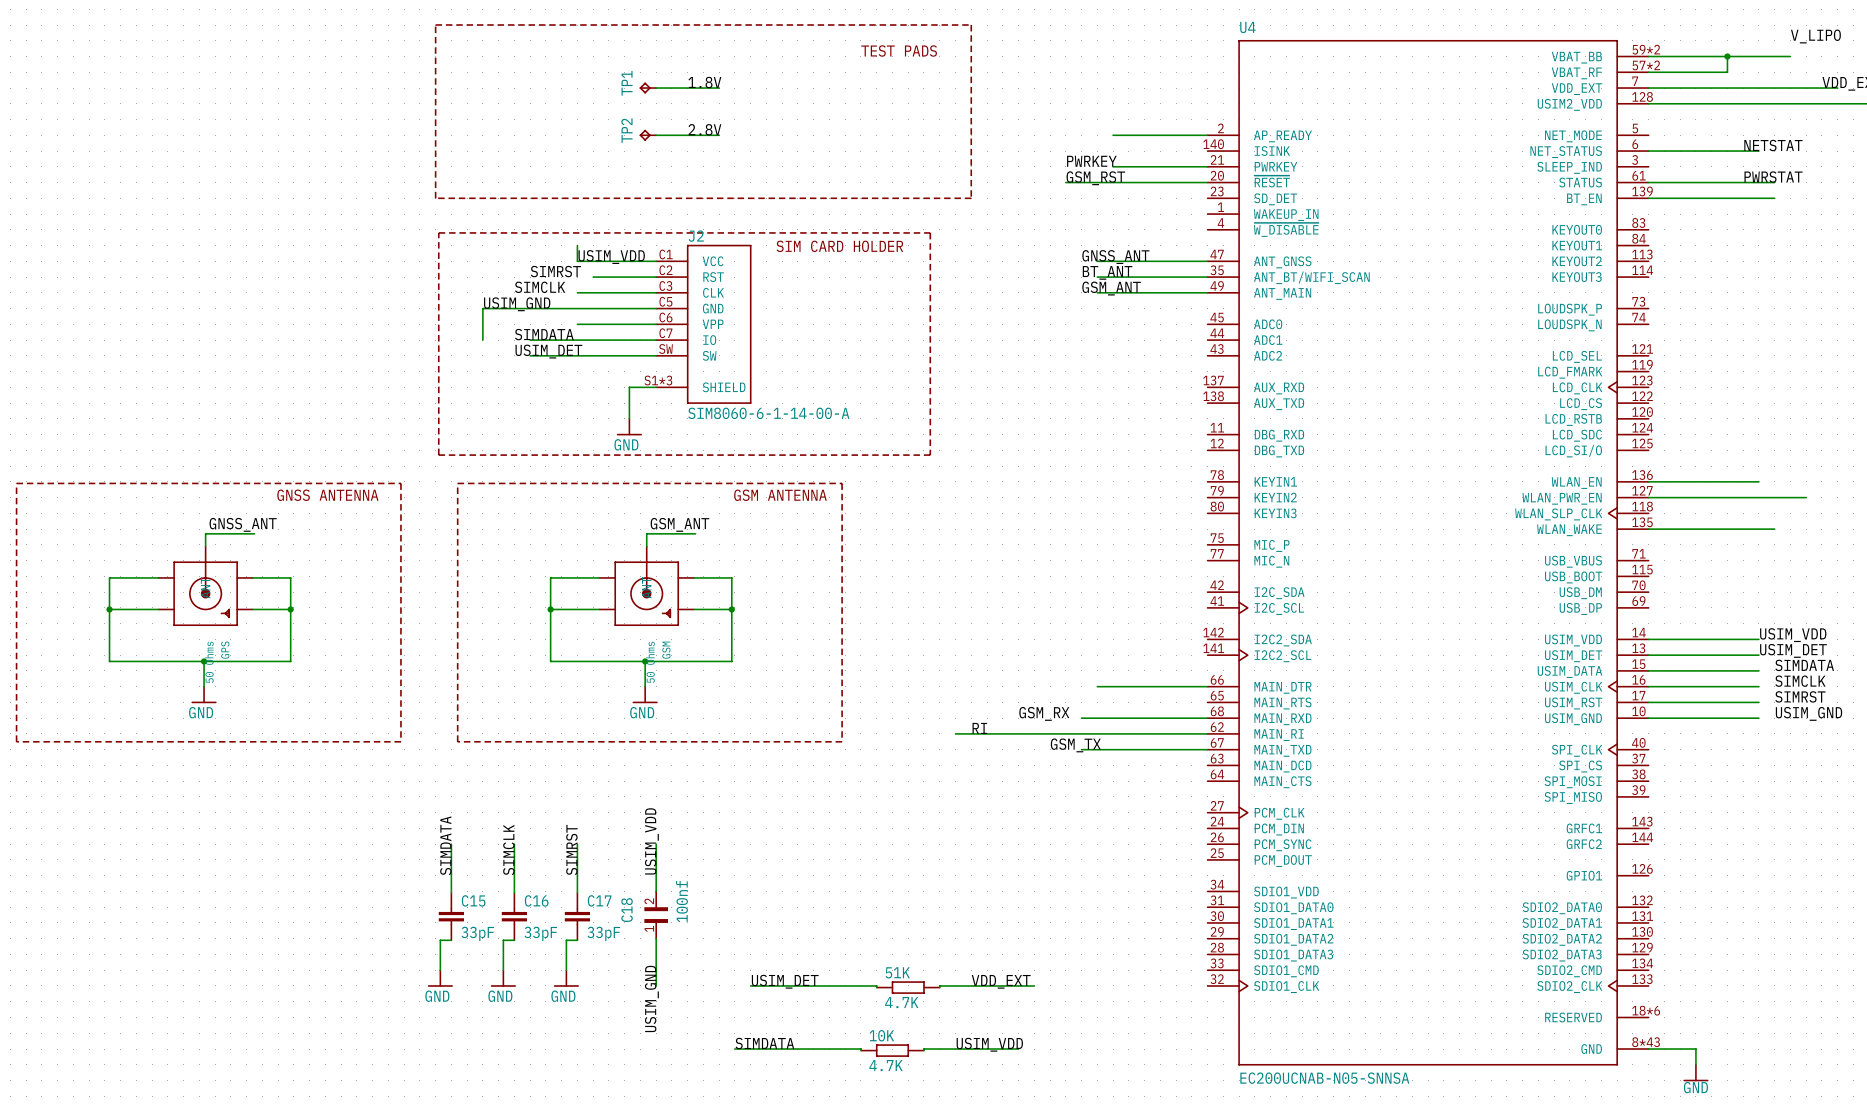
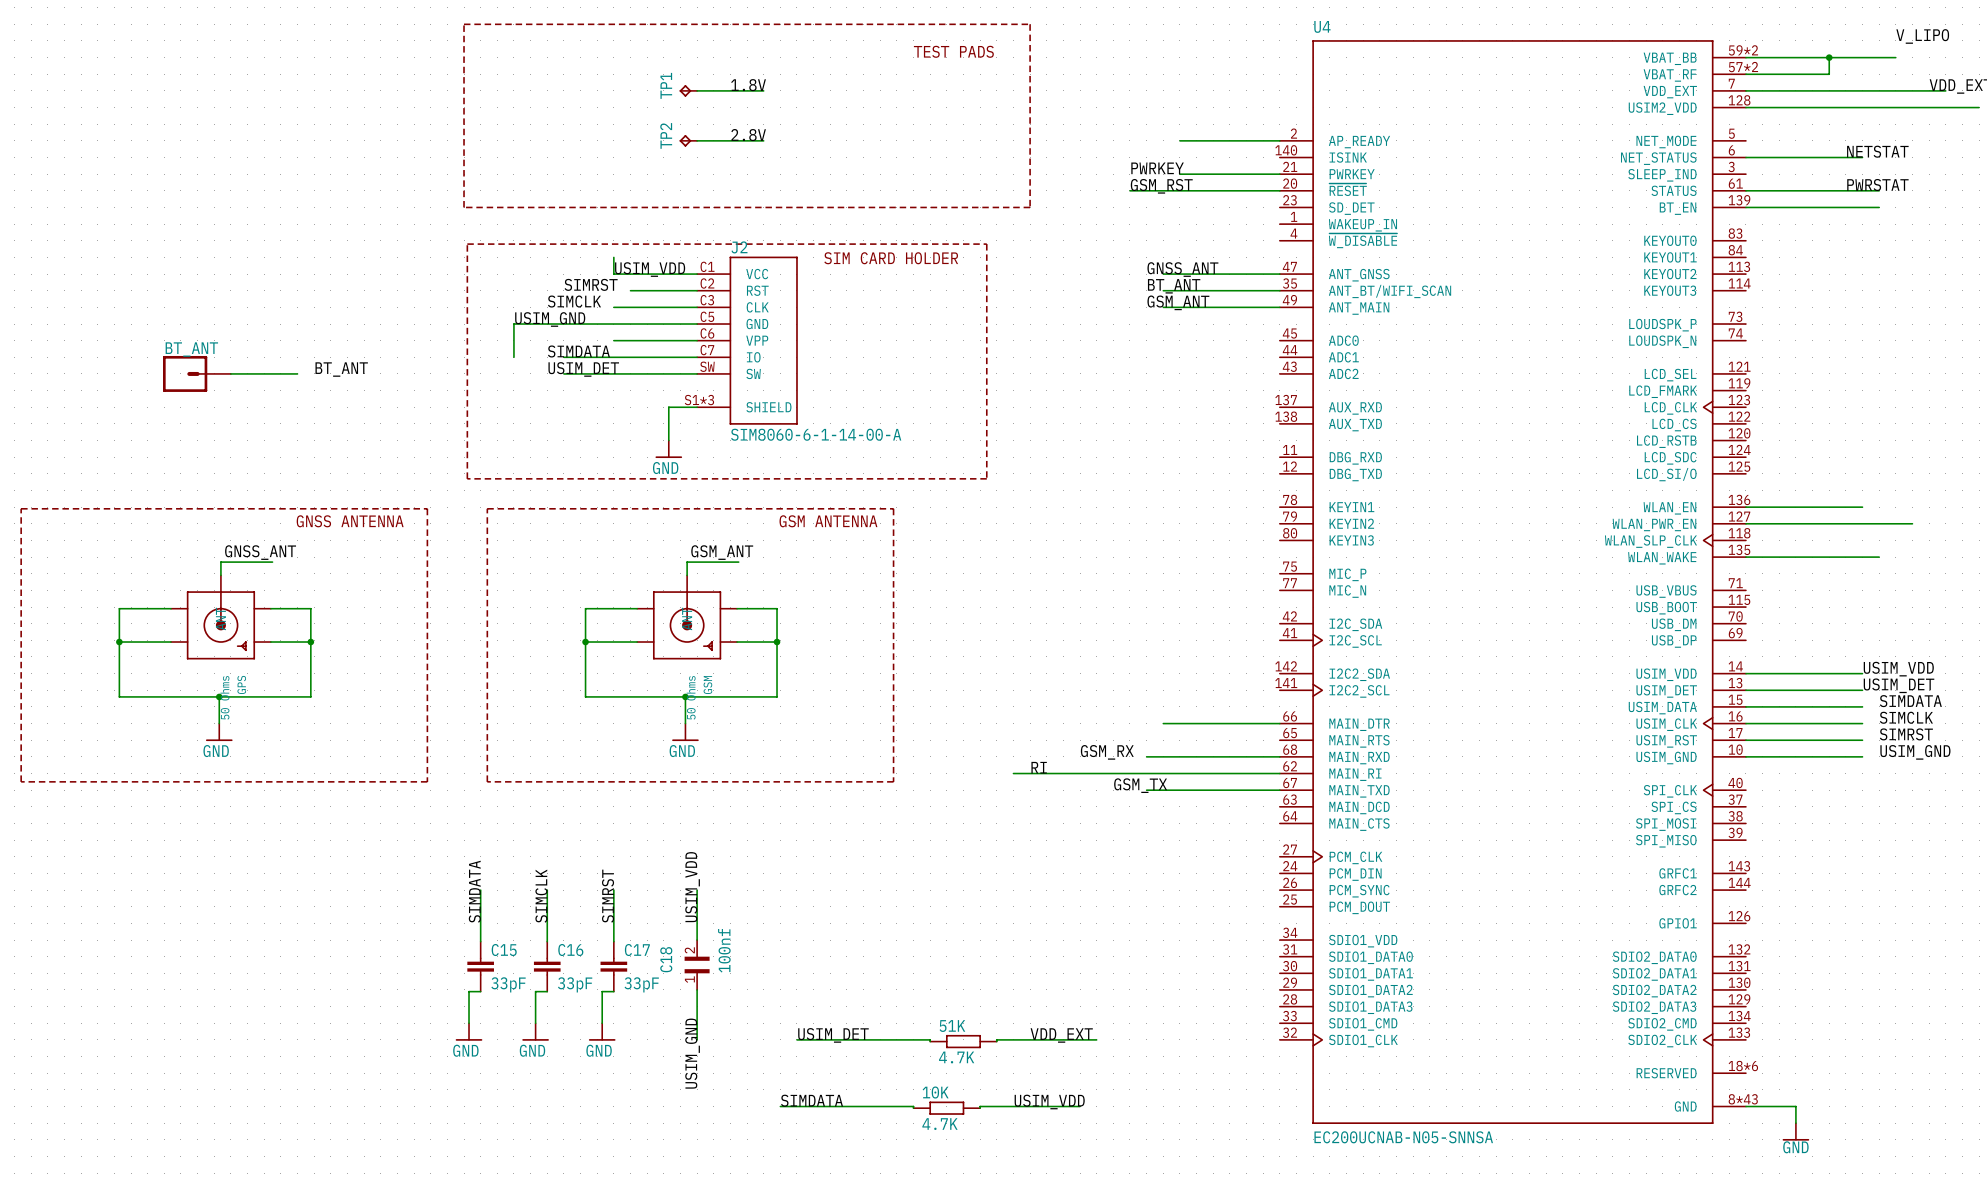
label: none -> BT_ANT (341, 369)
BT_ANT: none -> (196, 373)
wire: none -> (230, 373) (297, 373)

